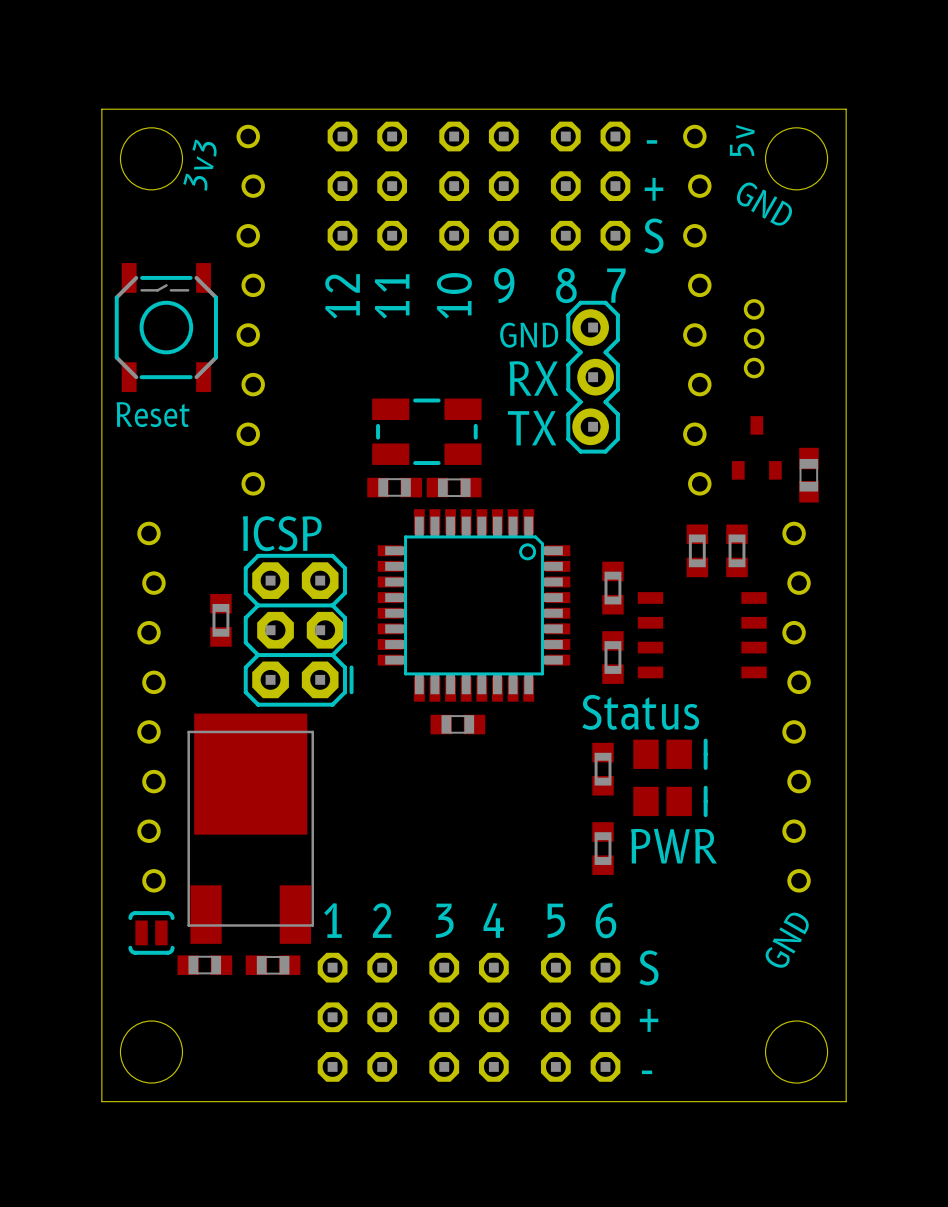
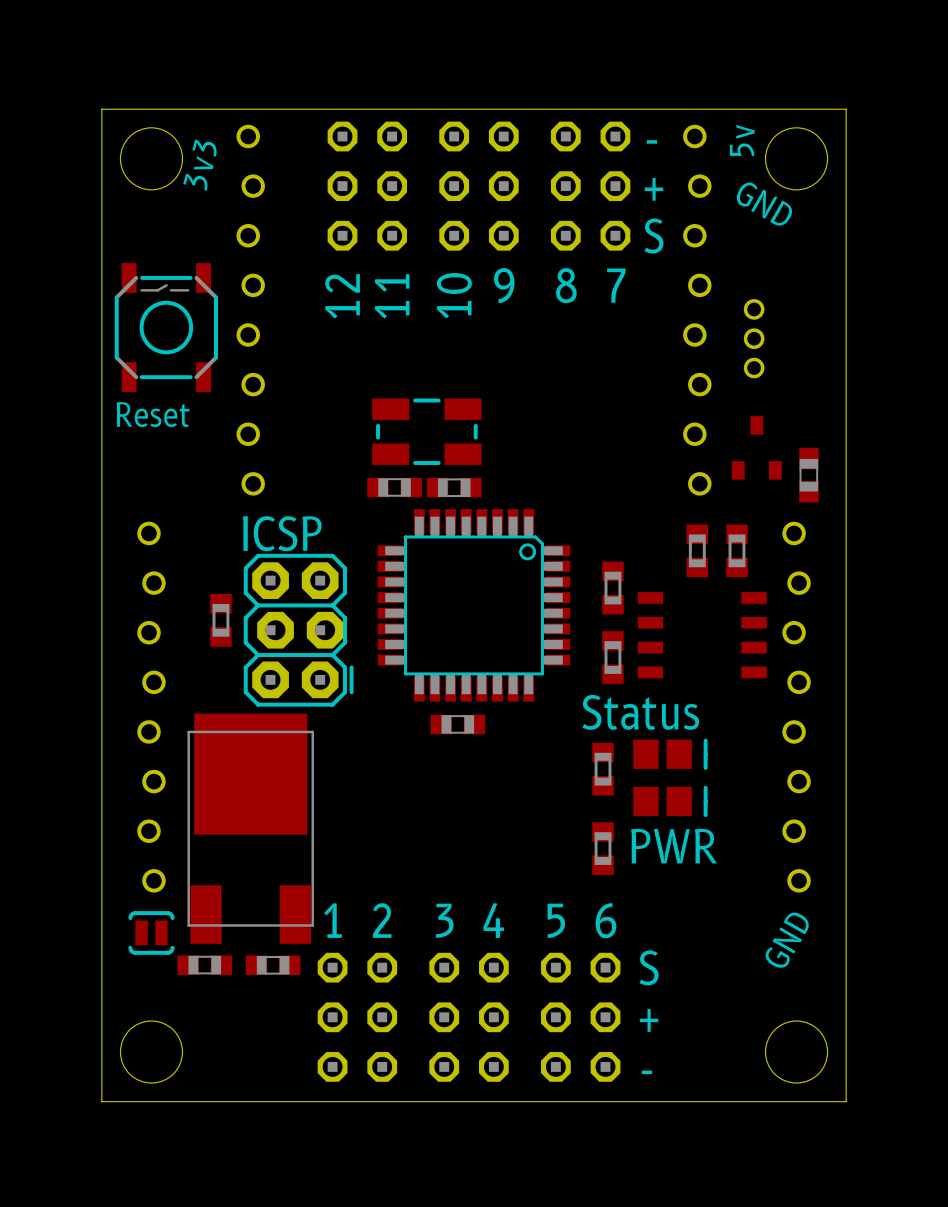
text: GND (529, 335) -> none
part: (593, 377) -> none
text: RX (533, 378) -> none
text: TX (532, 428) -> none

